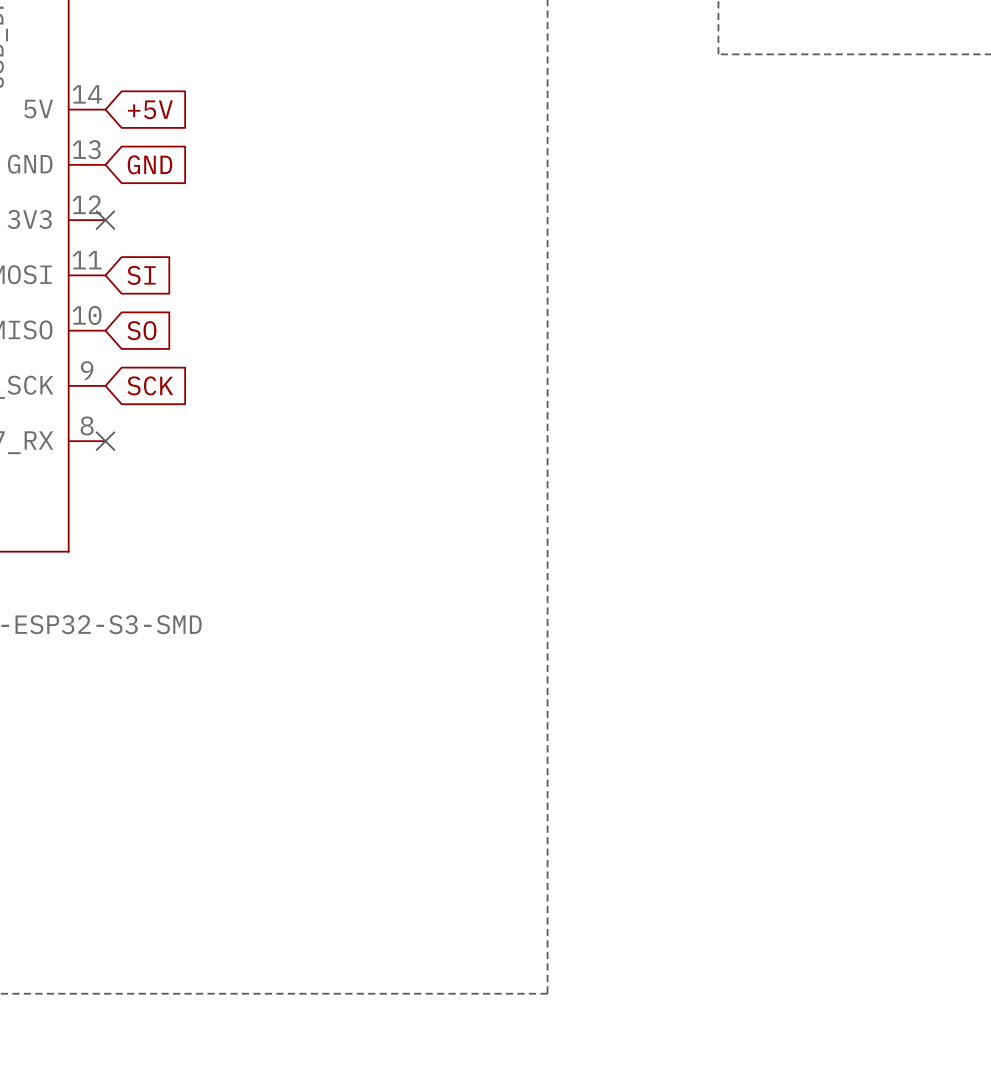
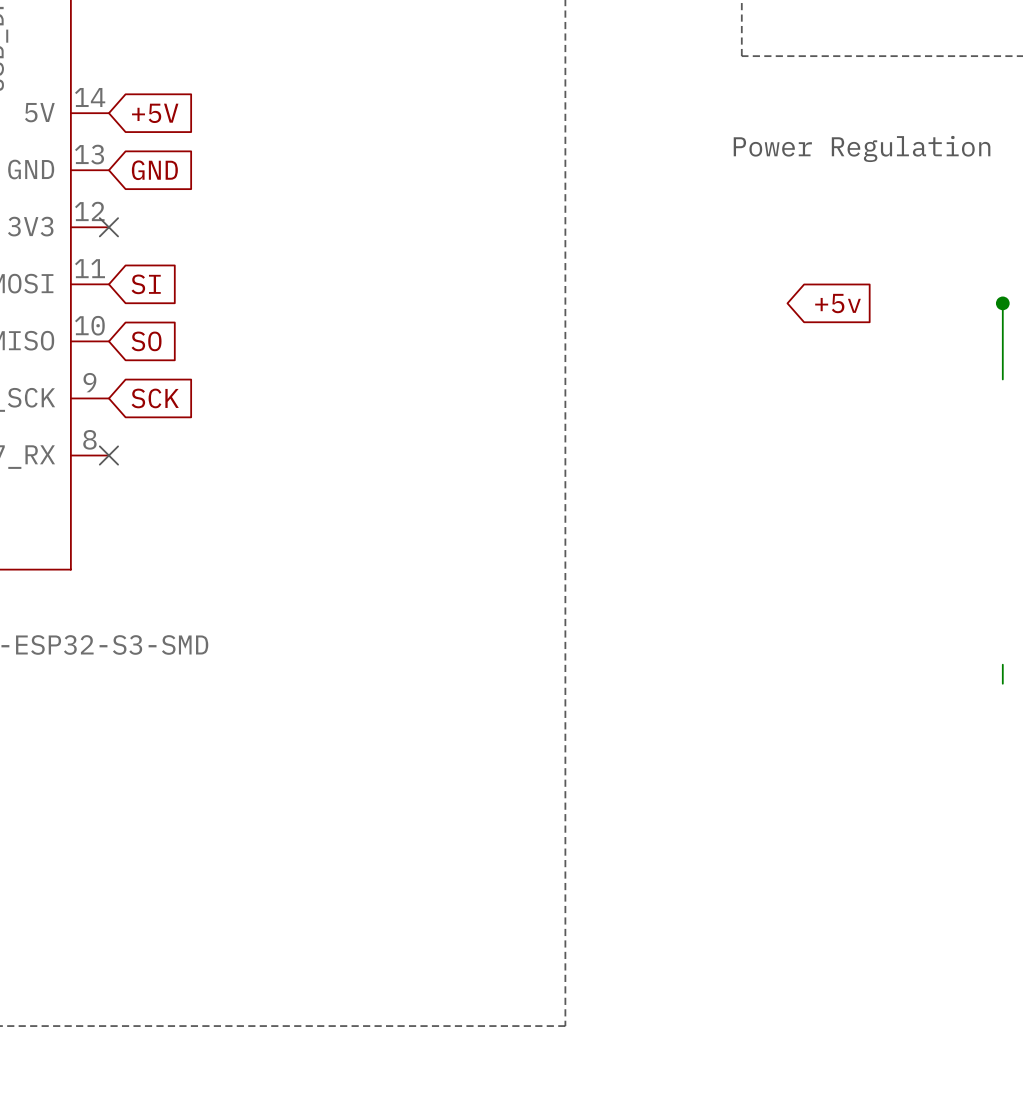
text: none -> Power Regulation (862, 148)
global label: none -> +5v (837, 303)
wire: none -> (1002, 303) (1002, 379)
junction: none -> (1002, 303)
wire: none -> (1002, 664) (1002, 683)

